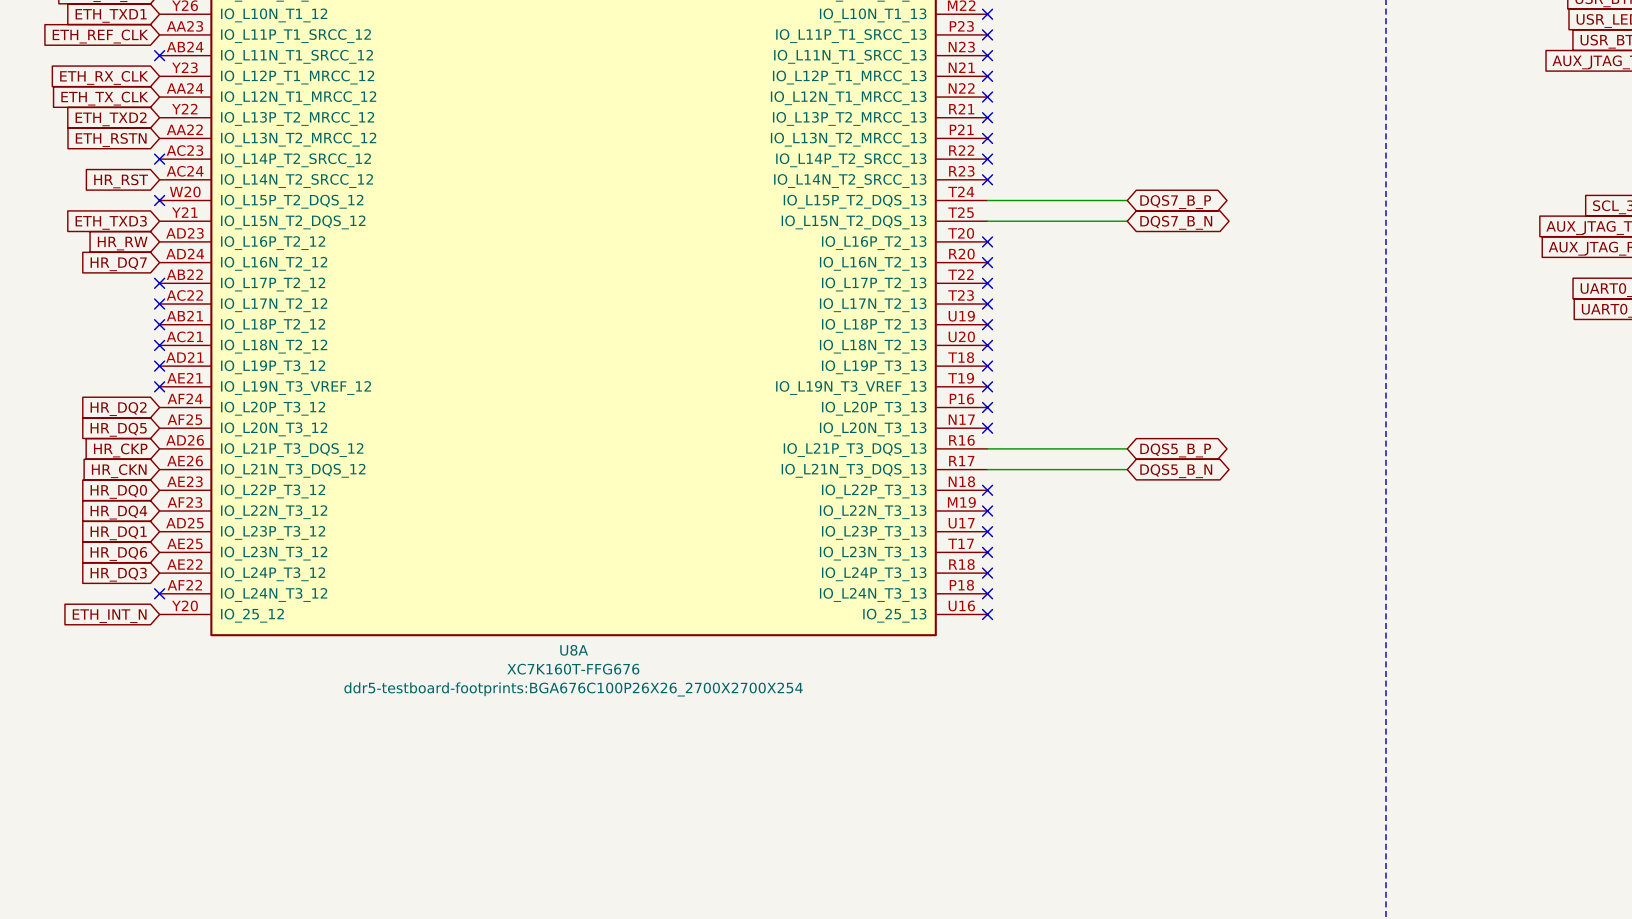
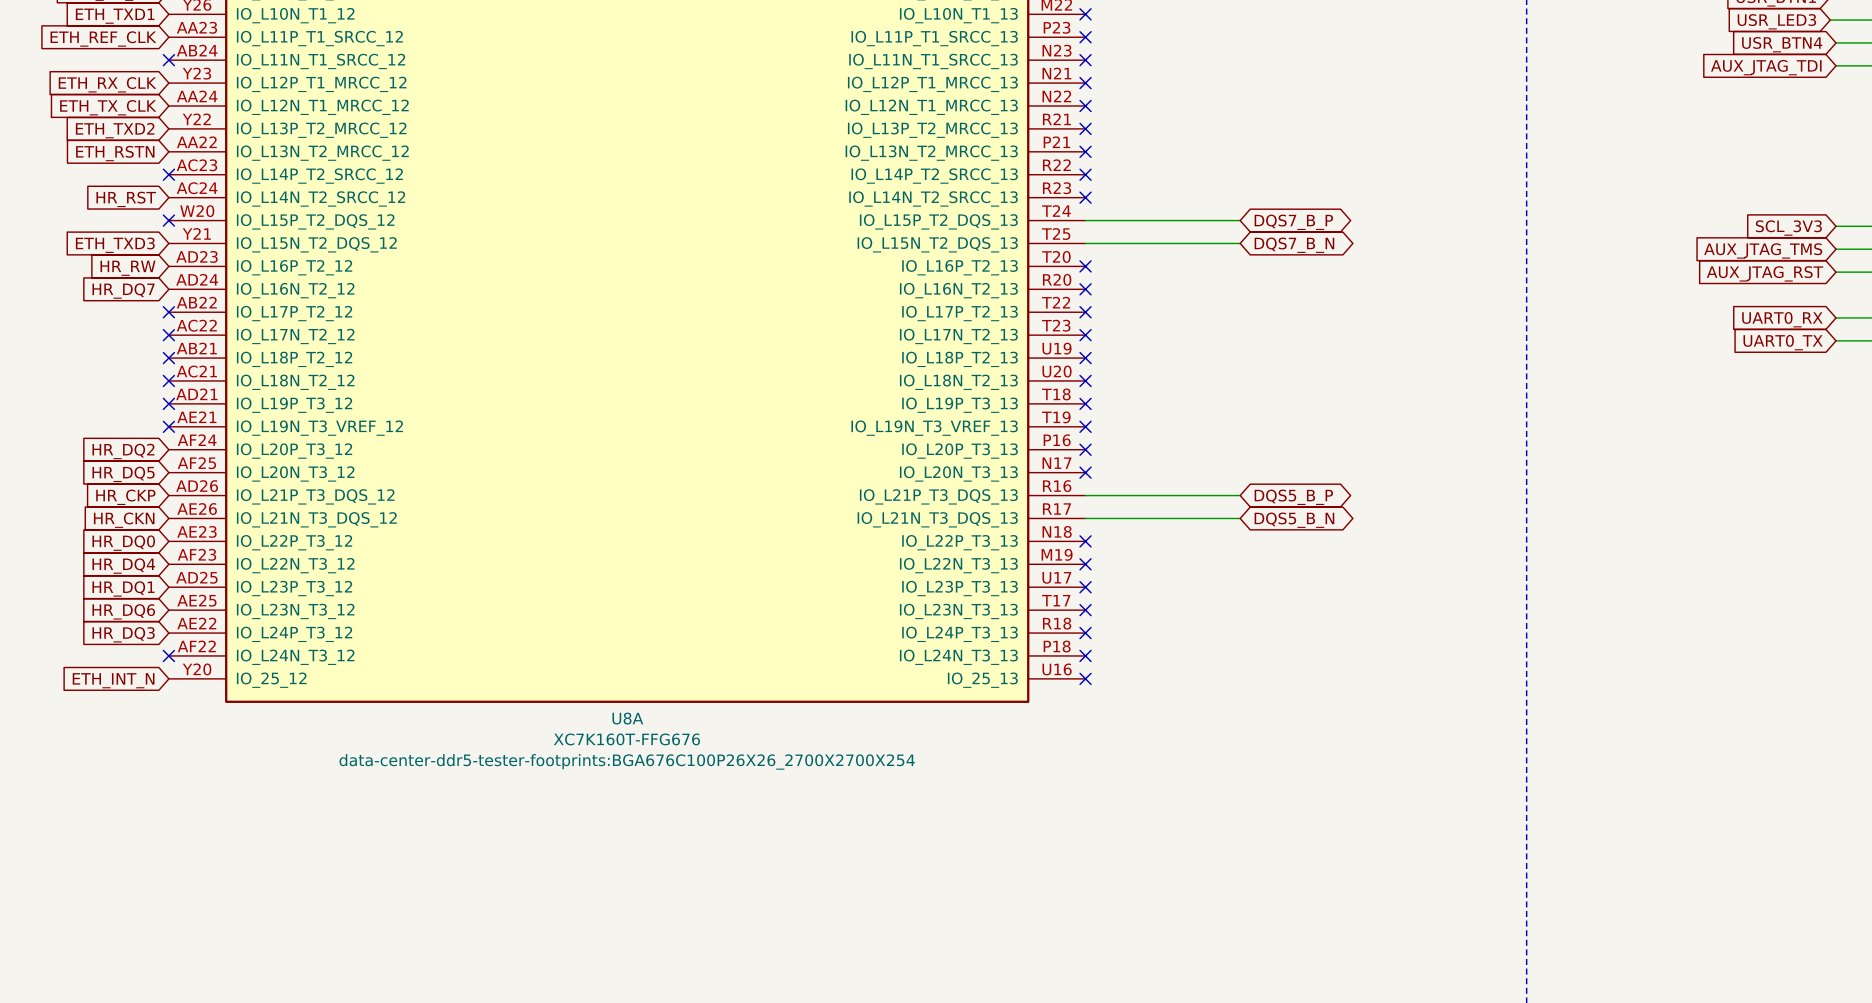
U8A text: ddr5-testboard-footprints:BGA676C100P26X26_2700X2700X254 (573, 689) -> data-center-ddr5-tester-footprints:BGA676C100P26X26_2700X2700X254 (627, 761)

